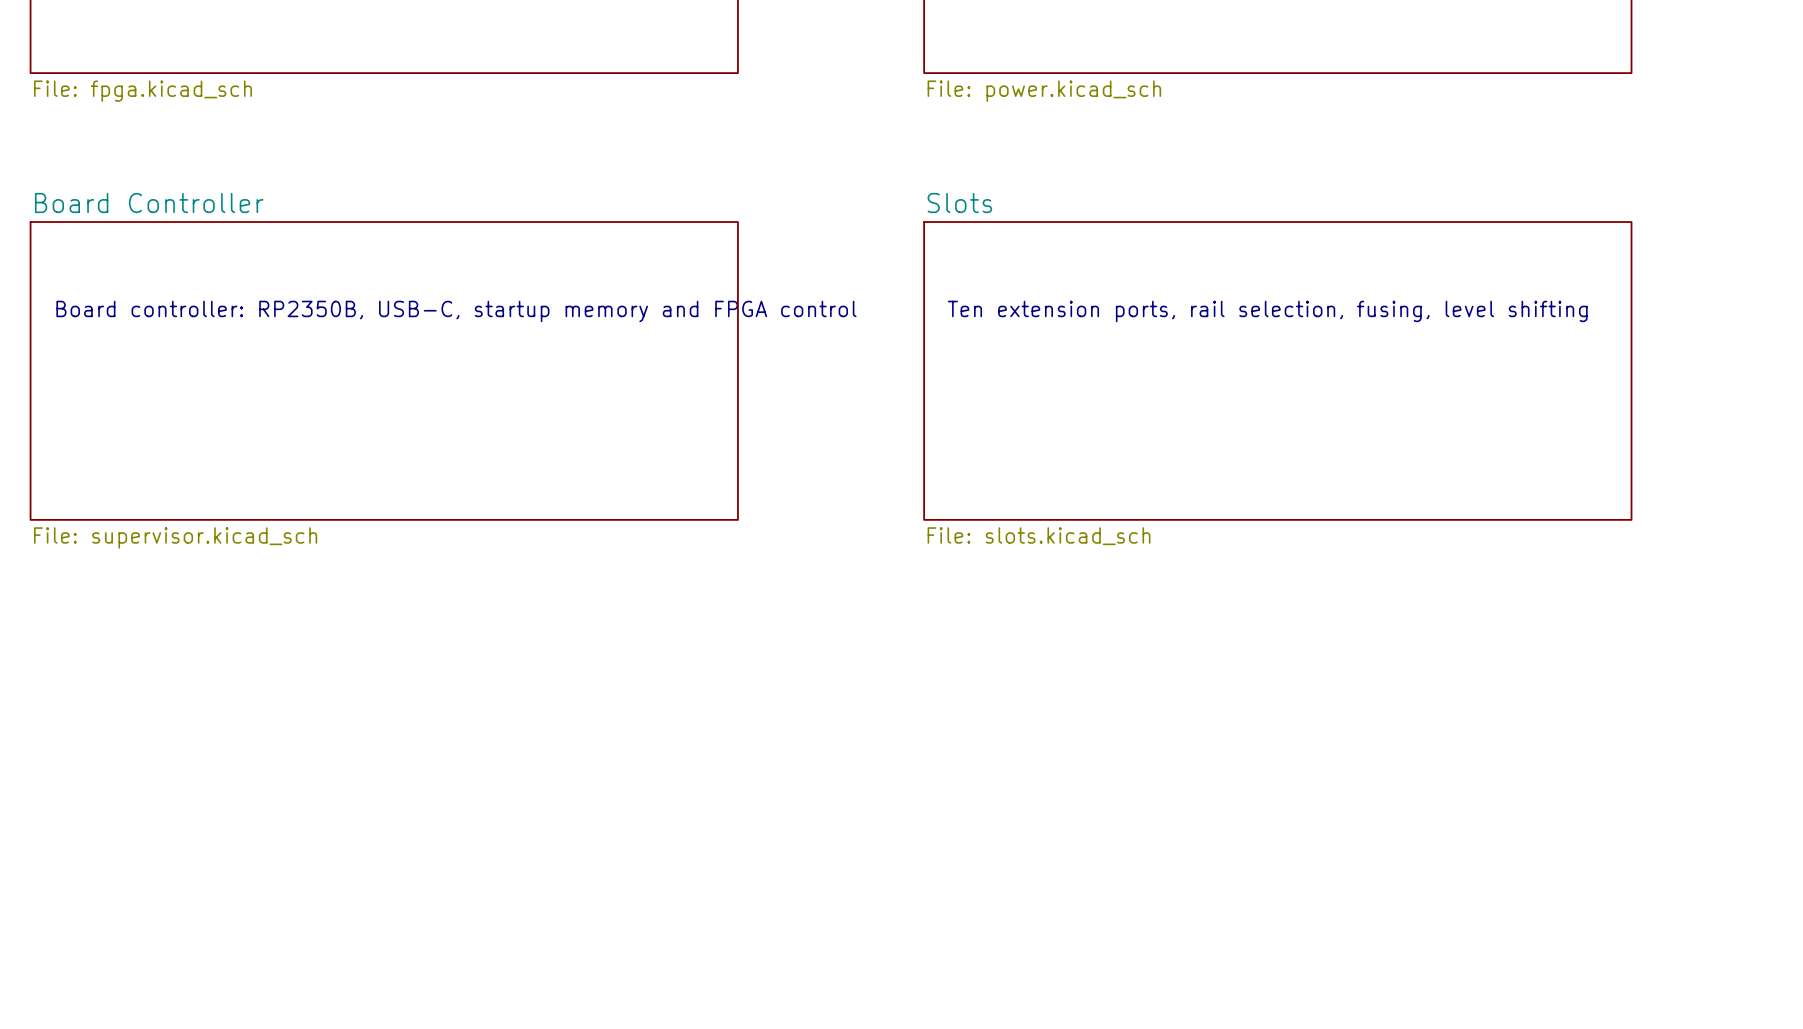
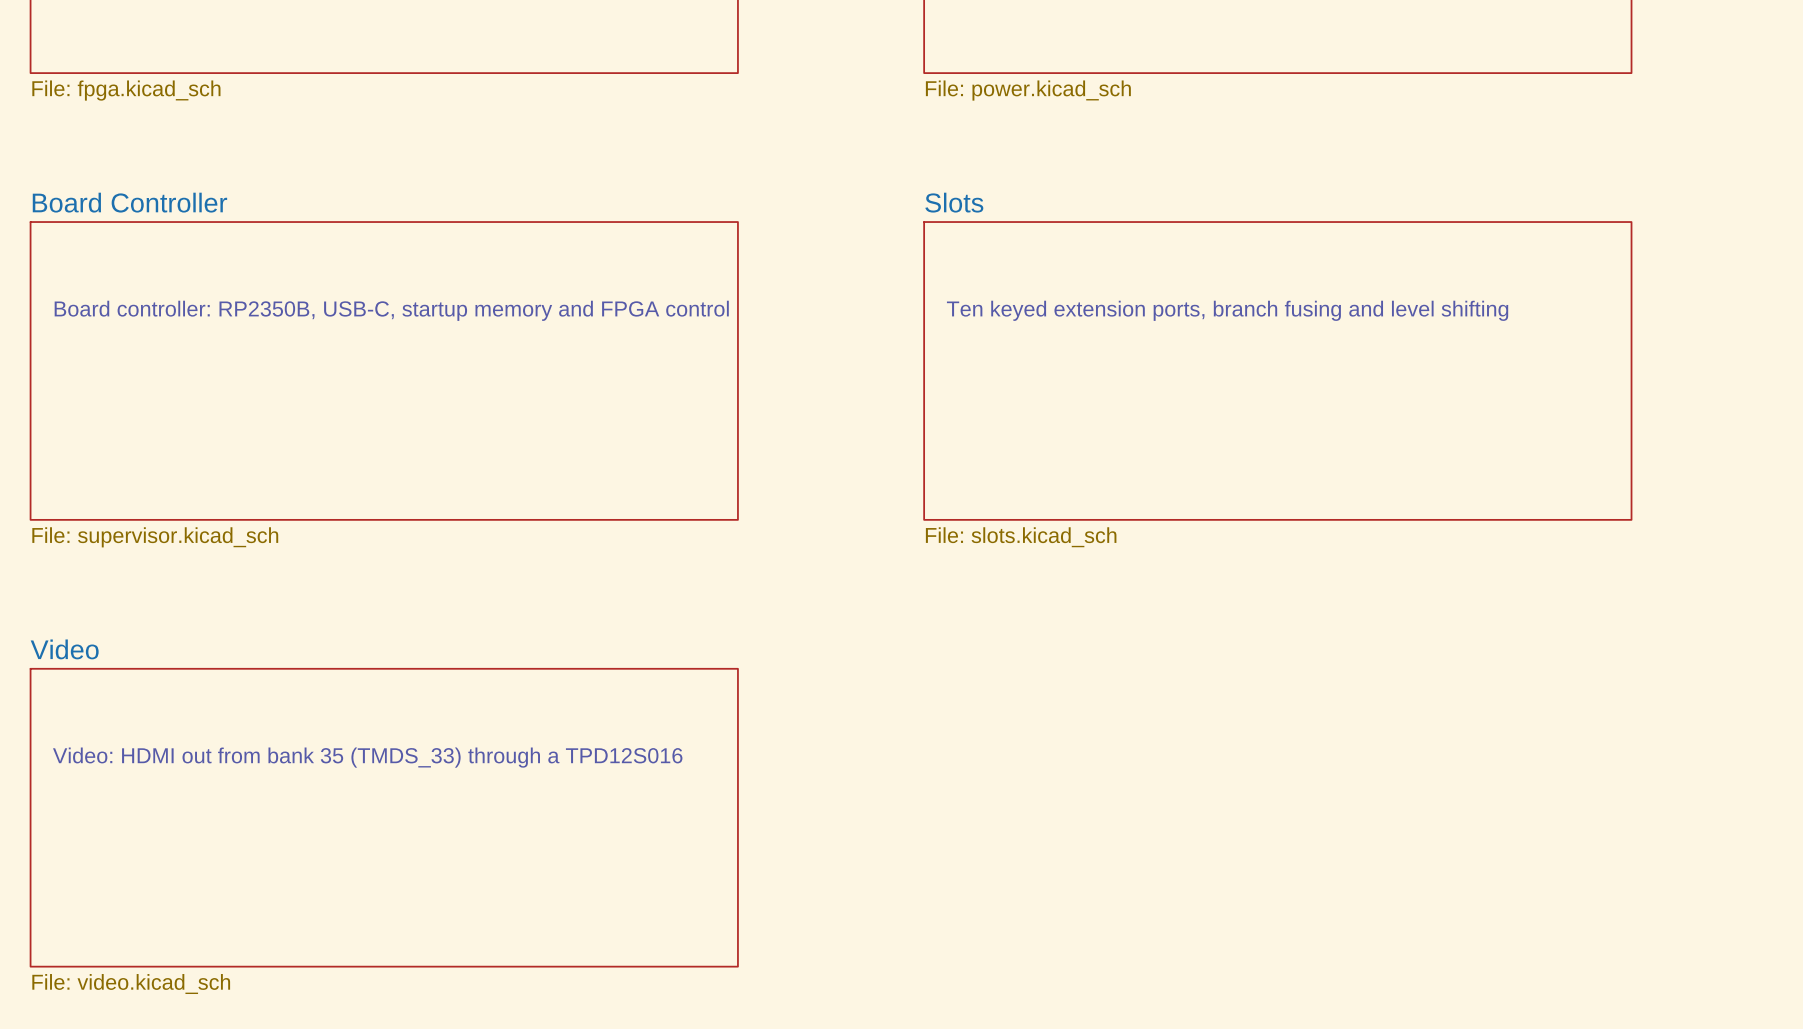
text: Ten extension ports, rail selection, fusing, level shifting (1267, 311) -> Ten keyed extension ports, branch fusing and level shifting (1227, 310)
text: none -> Video: HDMI out from bank 35 (TMDS_33) through a TPD12S016 (367, 757)
sheet Video: none -> File: video.kicad_sch (384, 817)

